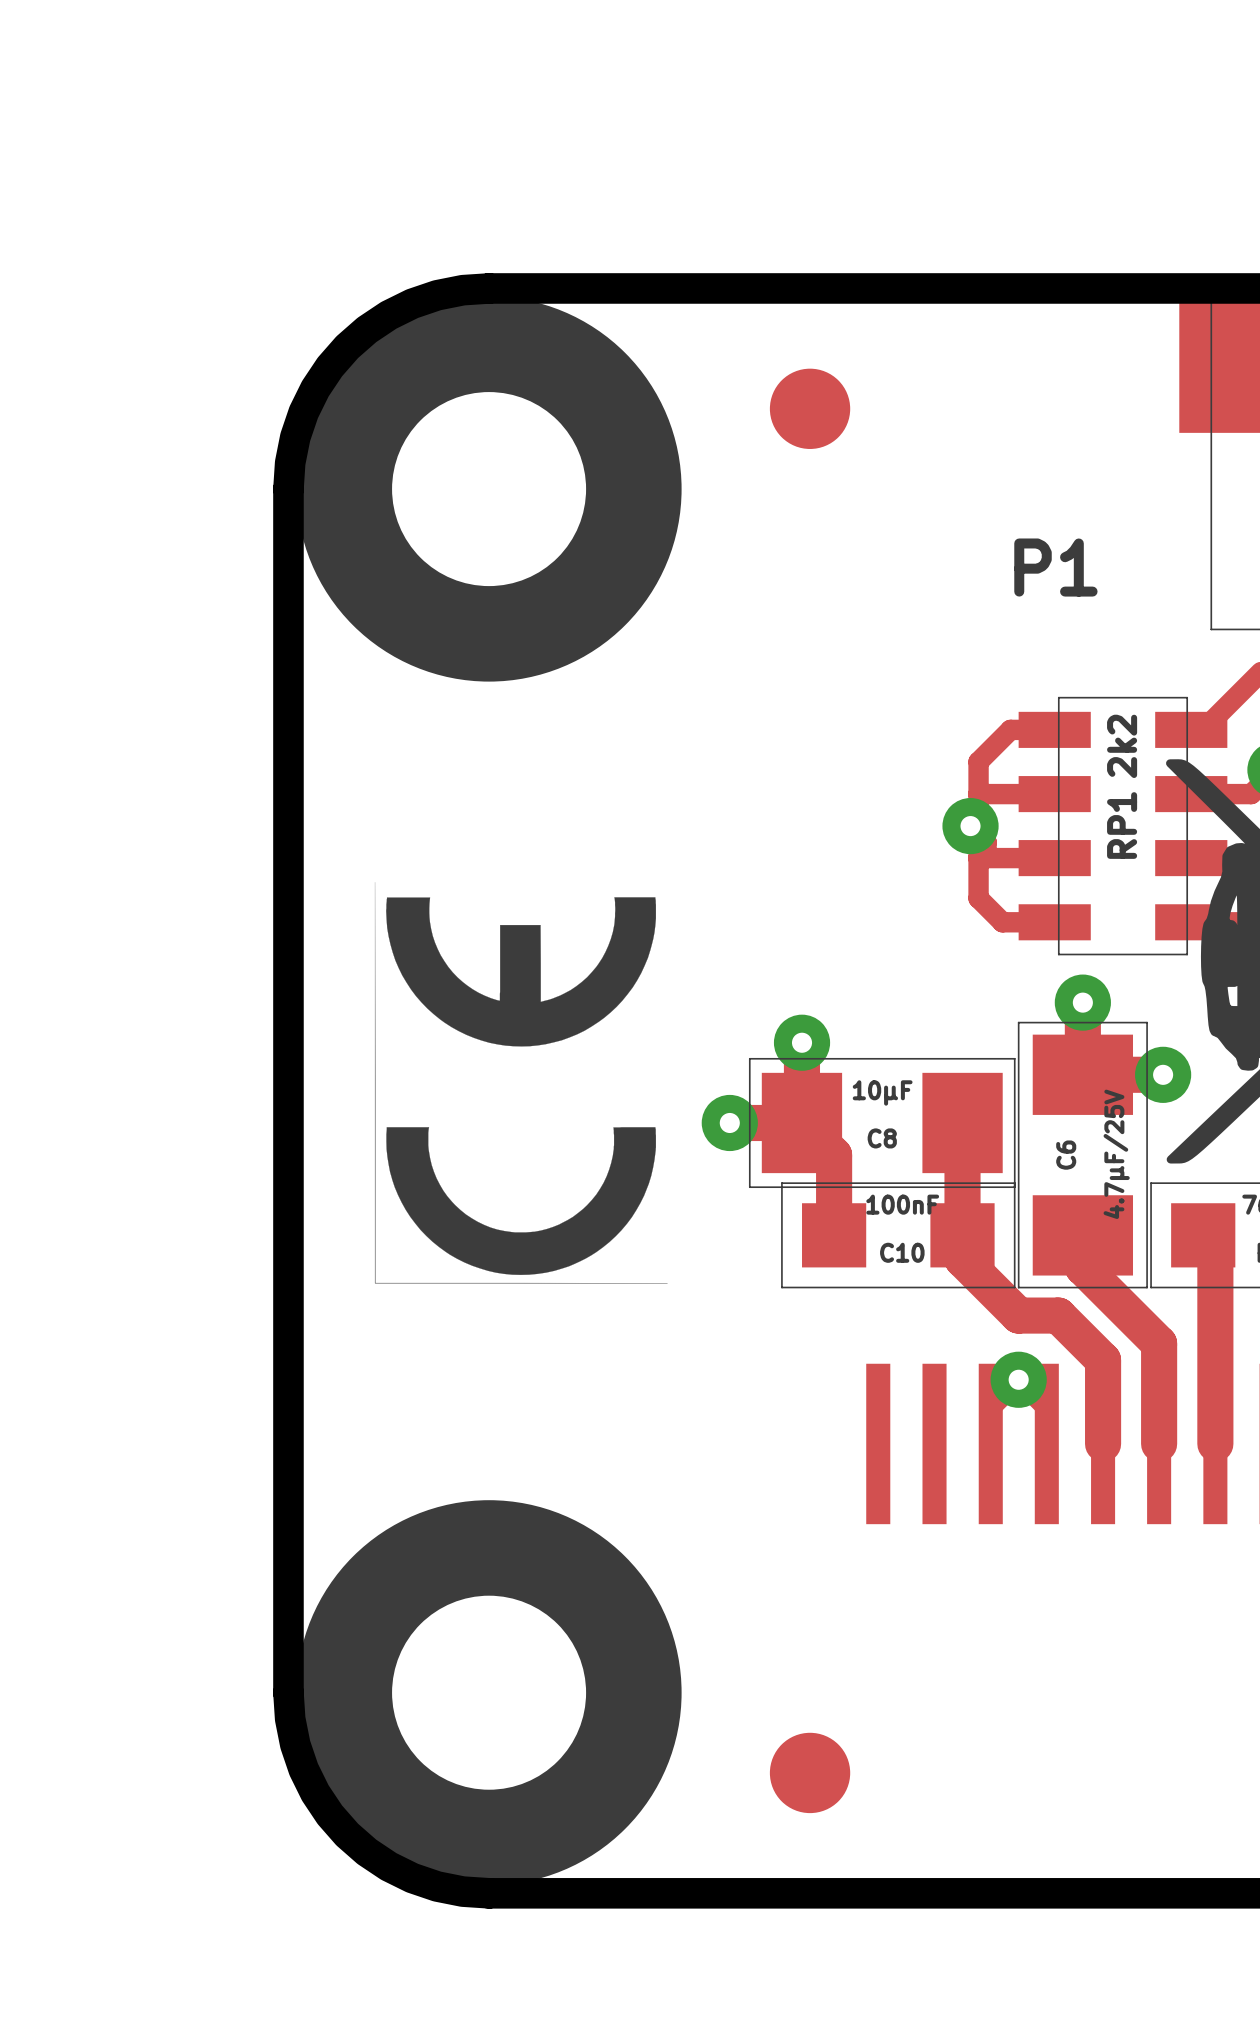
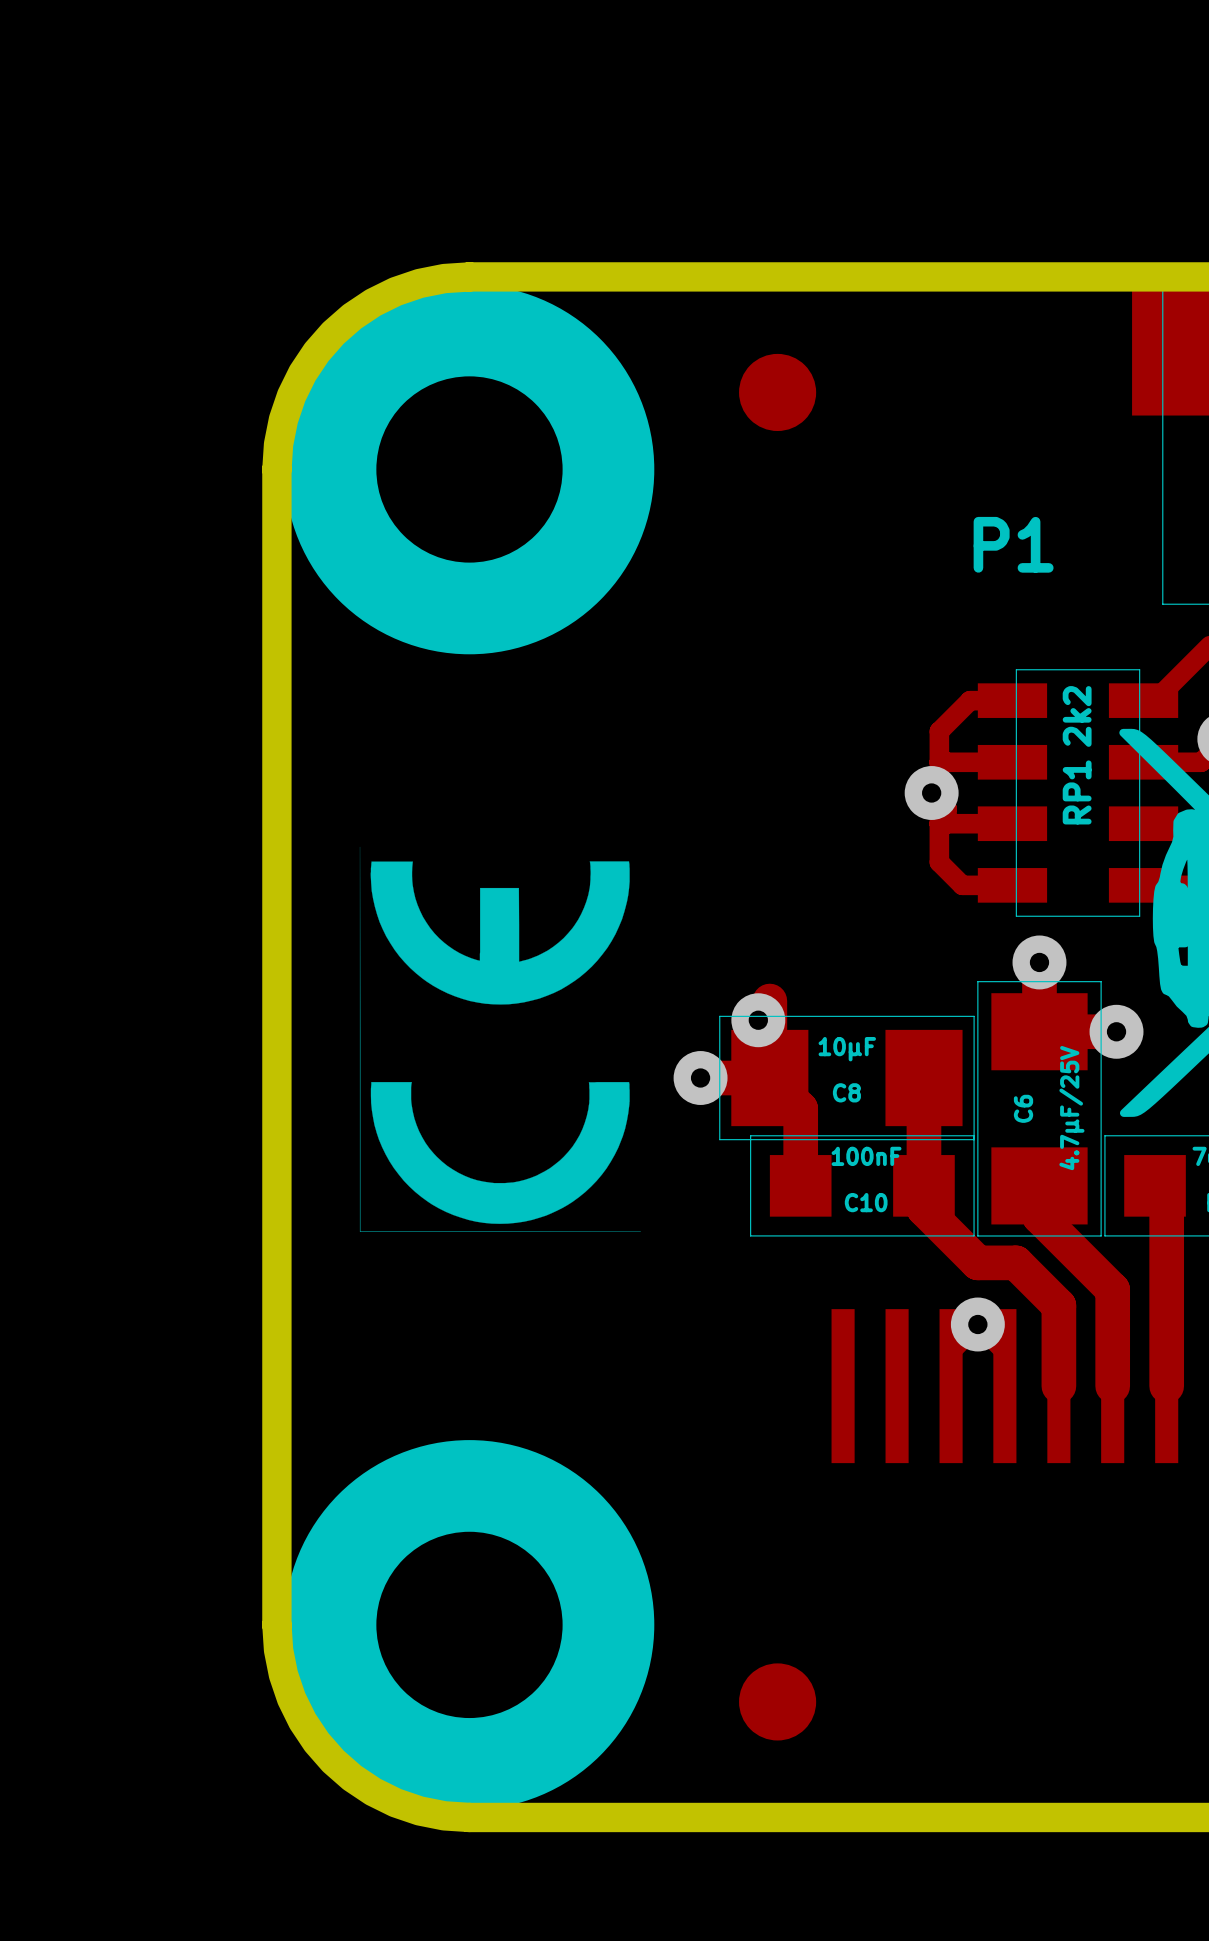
via position: (802, 1042) -> (758, 1020)

